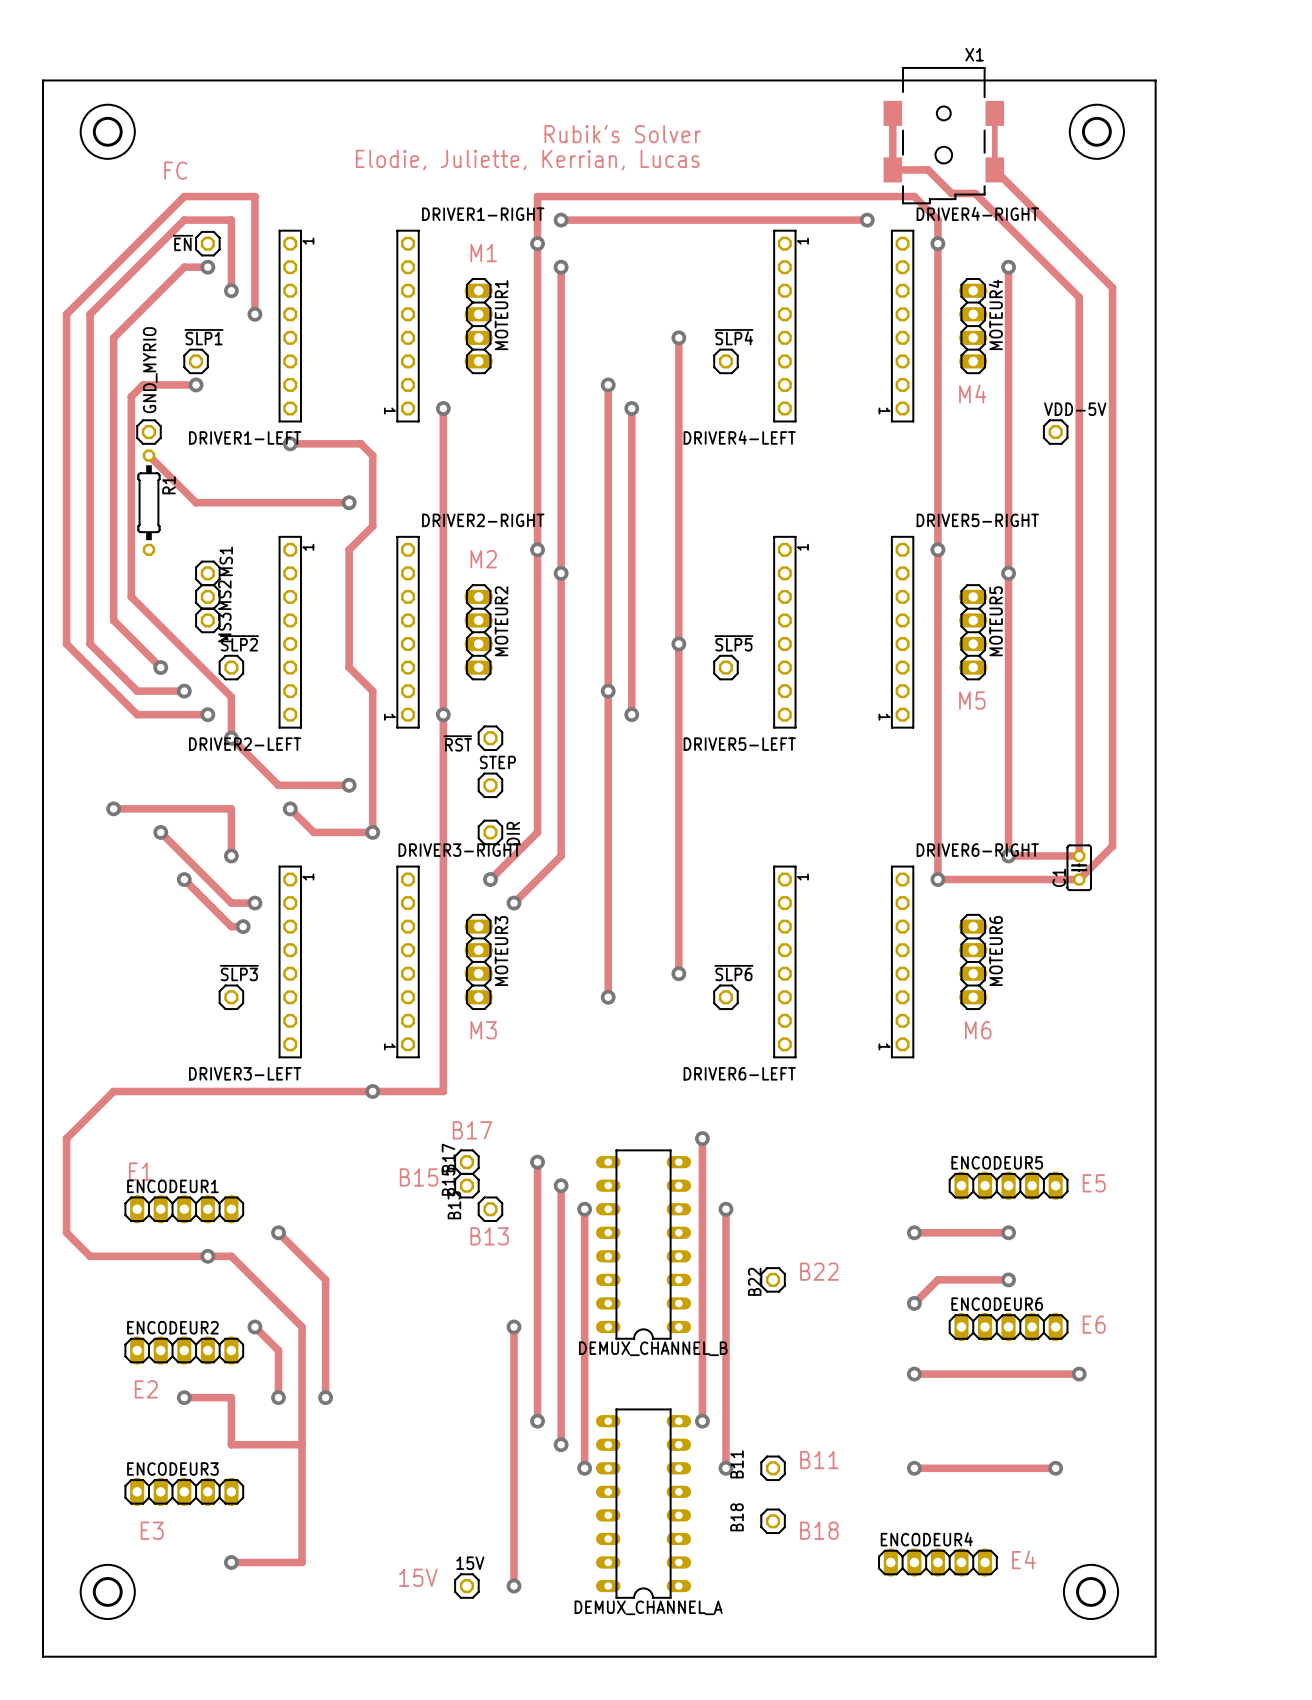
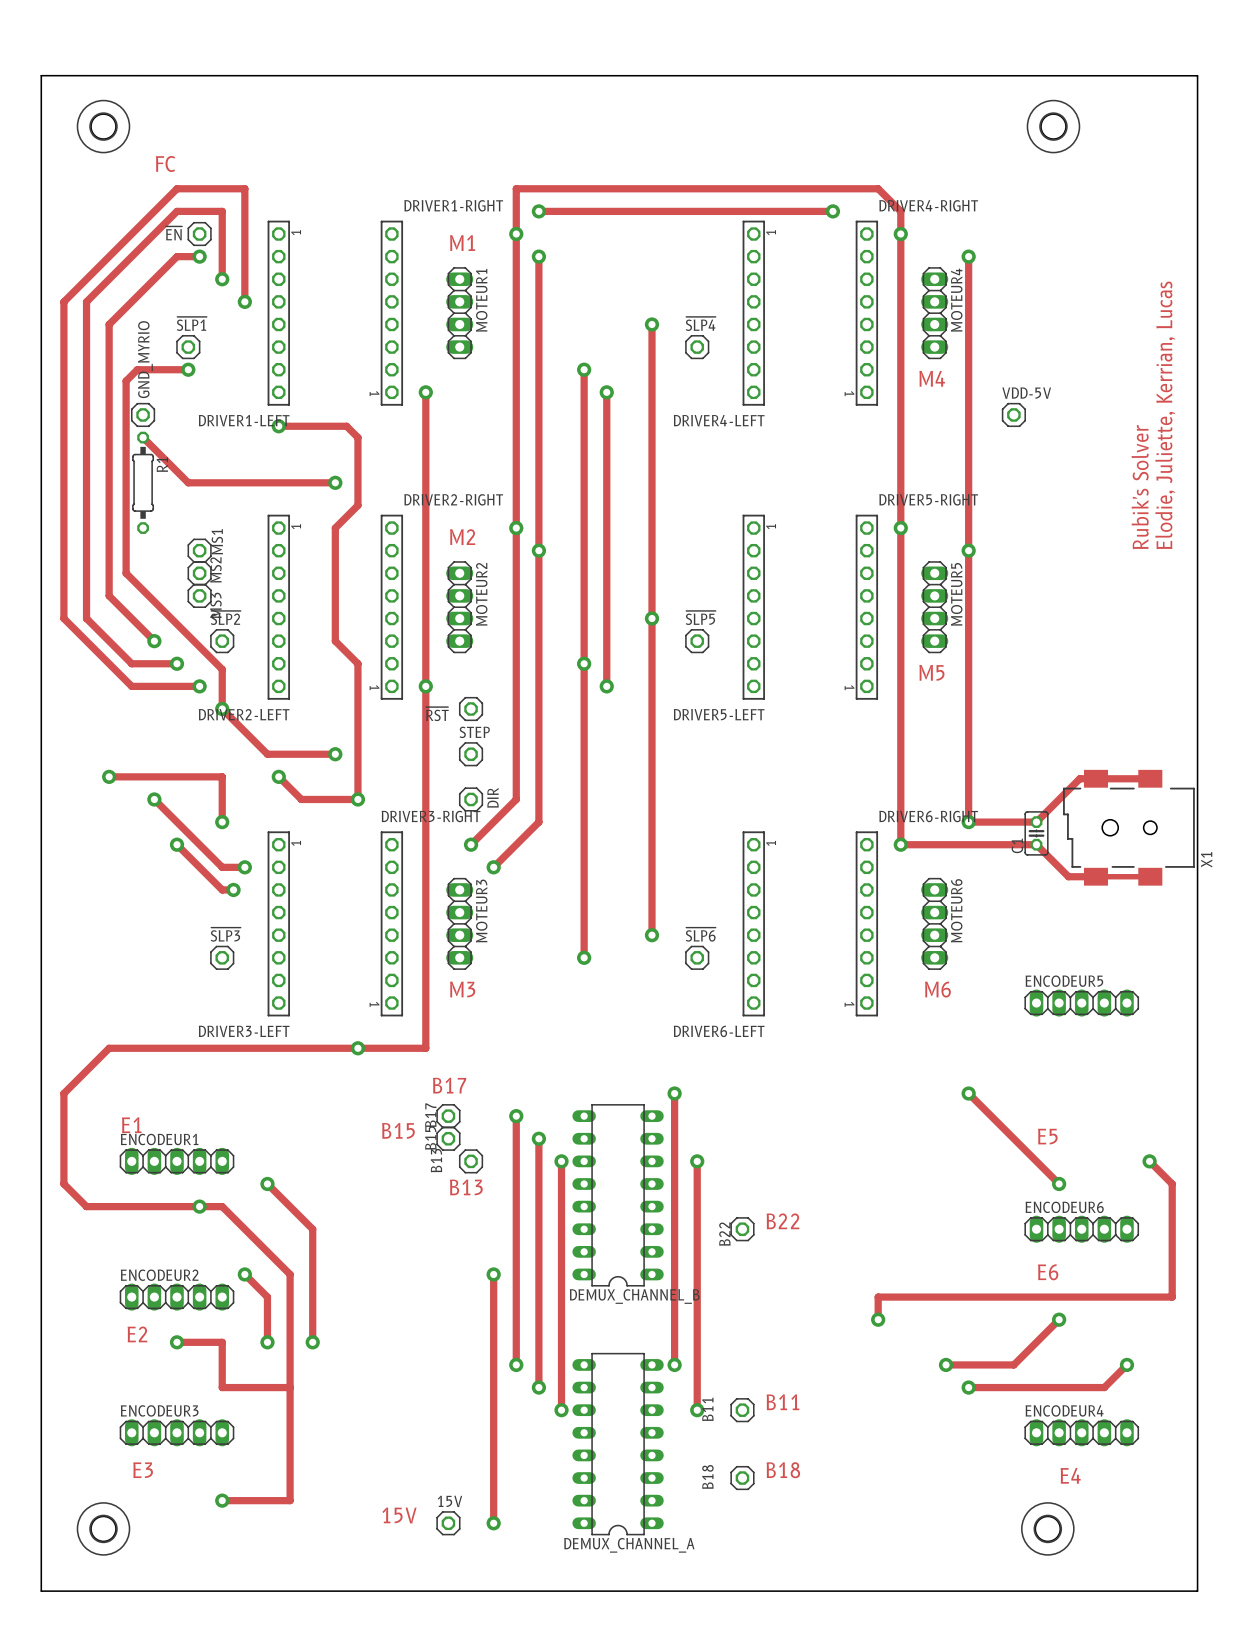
board edge: (42, 80) (1155, 80) (1155, 1656) -> (41, 77) (41, 75) (1197, 75) (1197, 1591) (1109, 1591)
track: (892, 113) (892, 169) (928, 169) (951, 193) (975, 193) (1079, 297) (1079, 855) -> (1150, 778) (1079, 778) (1036, 822)
track: (994, 113) (994, 169) (1112, 287) (1112, 846) (1079, 879) -> (1150, 876) (1068, 876) (1036, 844)
text: Rubik's Solver (622, 134) -> none
X1 rotation: 0° (943, 135) -> 90° clockwise (1128, 827)
X1 position: (943, 135) -> (1128, 827)
text: Elodie, Juliette, Kerrian, Lucas (527, 160) -> none
text: none -> Elodie, Juliette, Kerrian, Lucas (1165, 415)
text: none -> Rubik's Solver (1140, 487)
track: none -> (968, 1093) (1059, 1183)
via: none -> (968, 1093)
ENCODEUR5 position: (1008, 1185) -> (1081, 1003)
via: none -> (1149, 1161)
track: (914, 1232) (1008, 1232) -> none
via: (914, 1232) -> none
via: (1008, 1232) -> none
via: none -> (1059, 1183)
track: (1008, 1279) (937, 1279) (914, 1303) -> none
via: (1008, 1279) -> none
via: (914, 1303) -> none
ENCODEUR6 position: (1008, 1326) -> (1081, 1229)
track: (914, 1374) (1079, 1374) -> (878, 1319) (878, 1297) (1172, 1297) (1172, 1183) (1149, 1161)
via position: (1079, 1374) -> (1059, 1319)
track: none -> (1059, 1319) (1013, 1364) (946, 1364)
via: none -> (946, 1364)
track: none -> (1126, 1364) (1104, 1387) (968, 1387)
via: none -> (1126, 1364)
via: none -> (968, 1387)
track: (914, 1468) (1055, 1468) -> none
via: (914, 1468) -> none
via: (1055, 1468) -> none
B18 position: (773, 1521) -> (742, 1478)
text position: E4 (1023, 1559) -> E4 (1070, 1475)
ENCODEUR4 position: (937, 1562) -> (1081, 1432)

